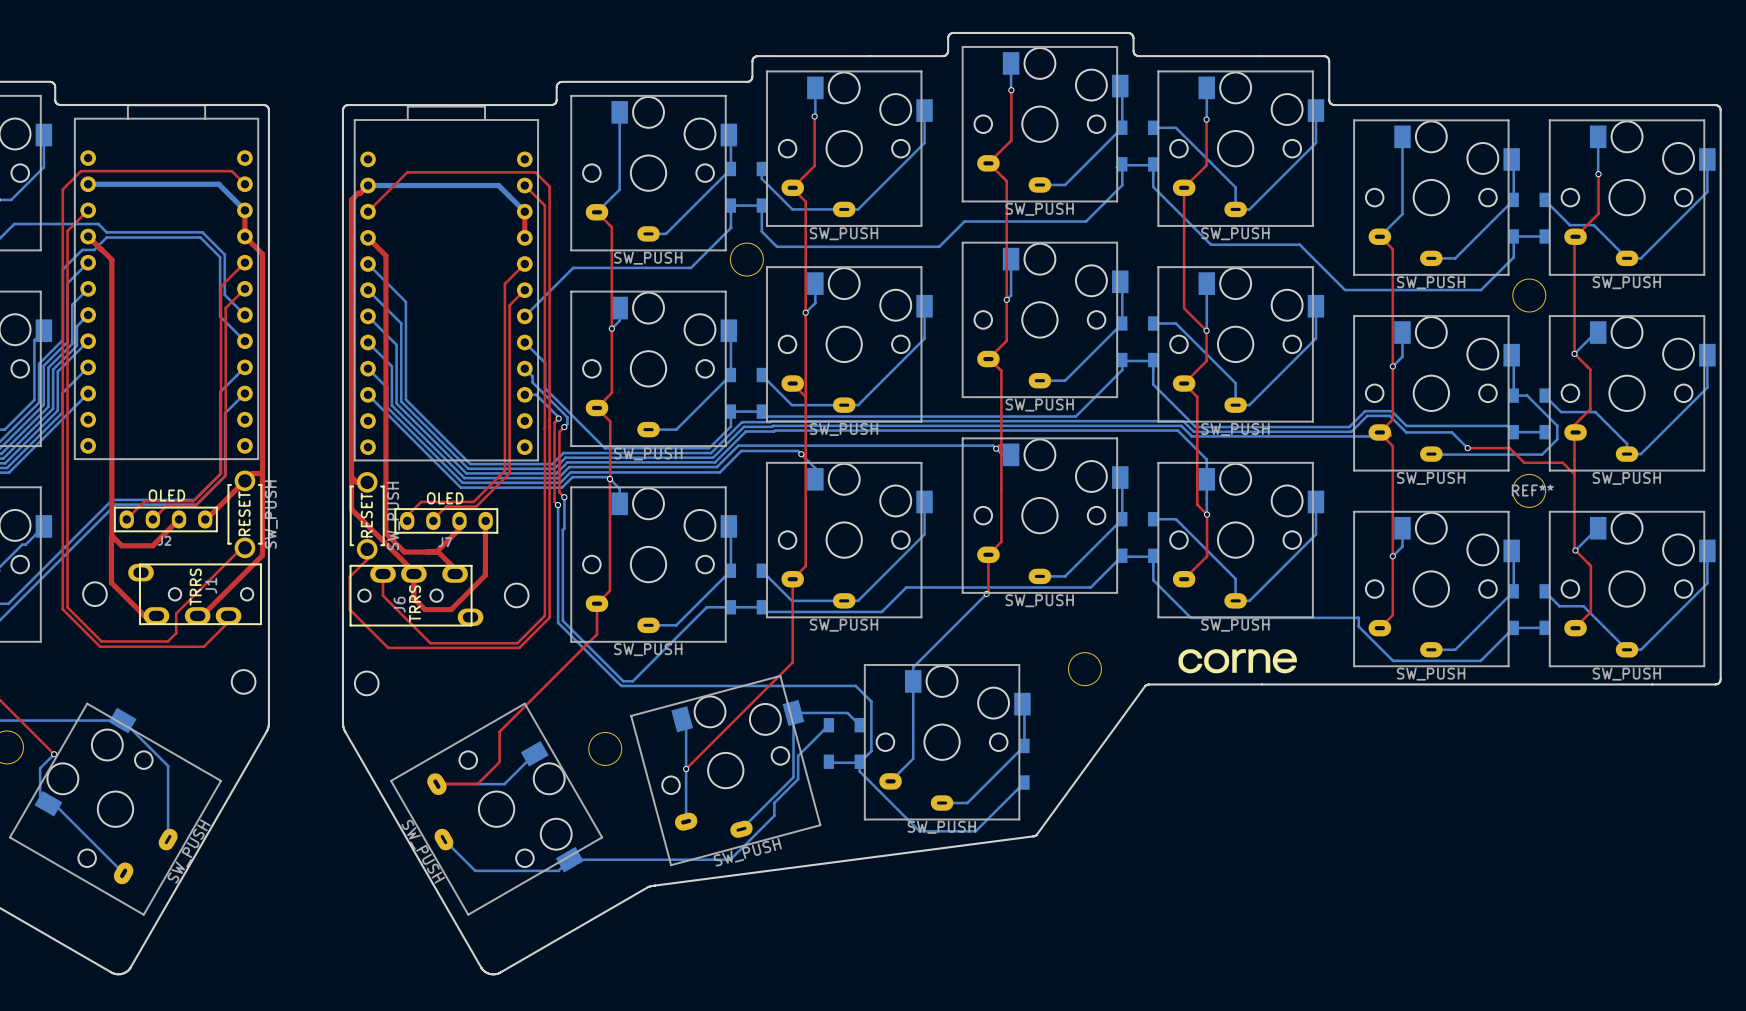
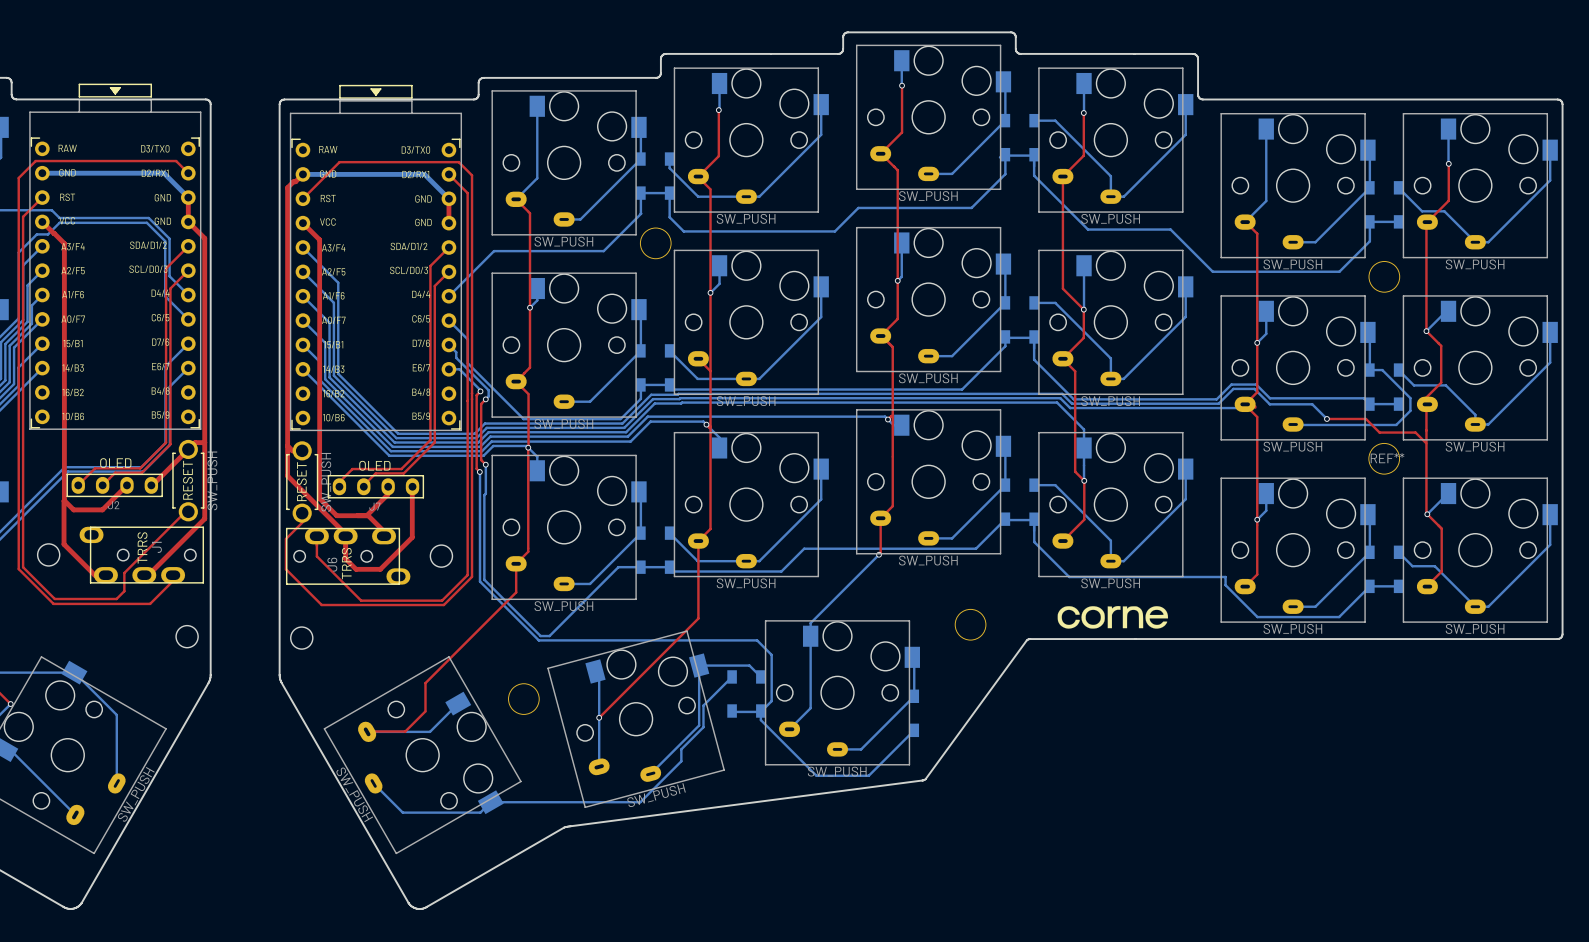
part footprint: [74, 104, 259, 460] -> [29, 83, 202, 430]
part footprint: [353, 105, 539, 462] -> [289, 84, 463, 432]

